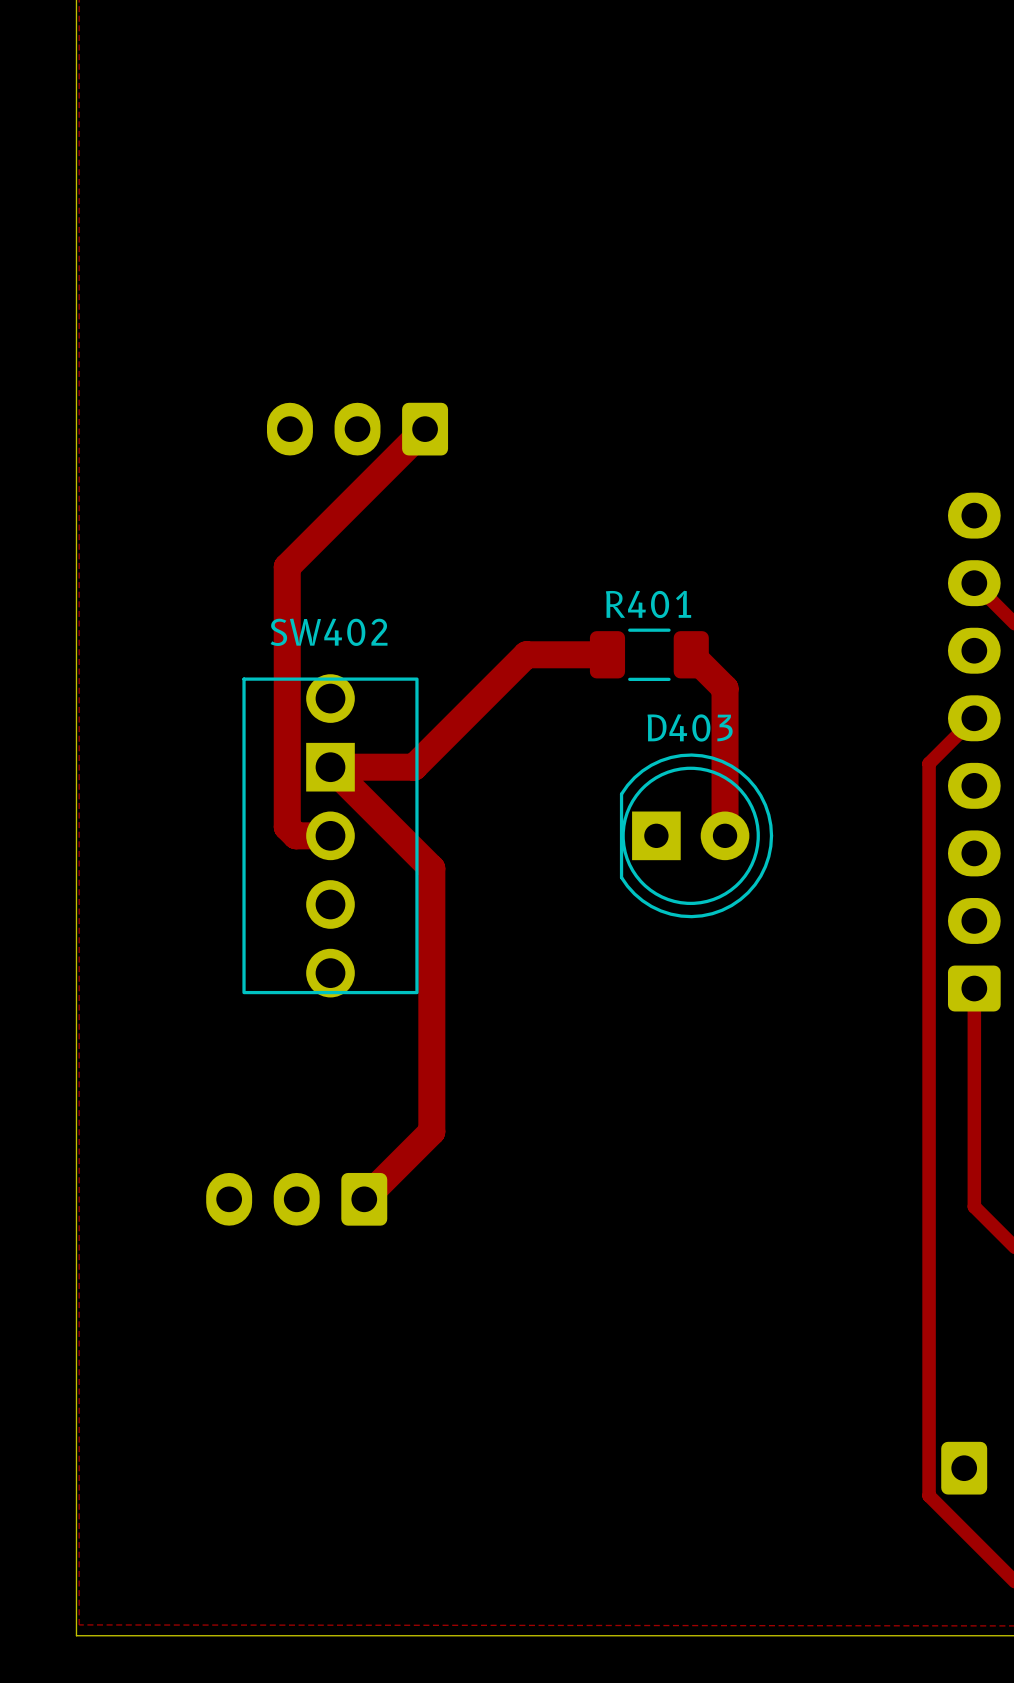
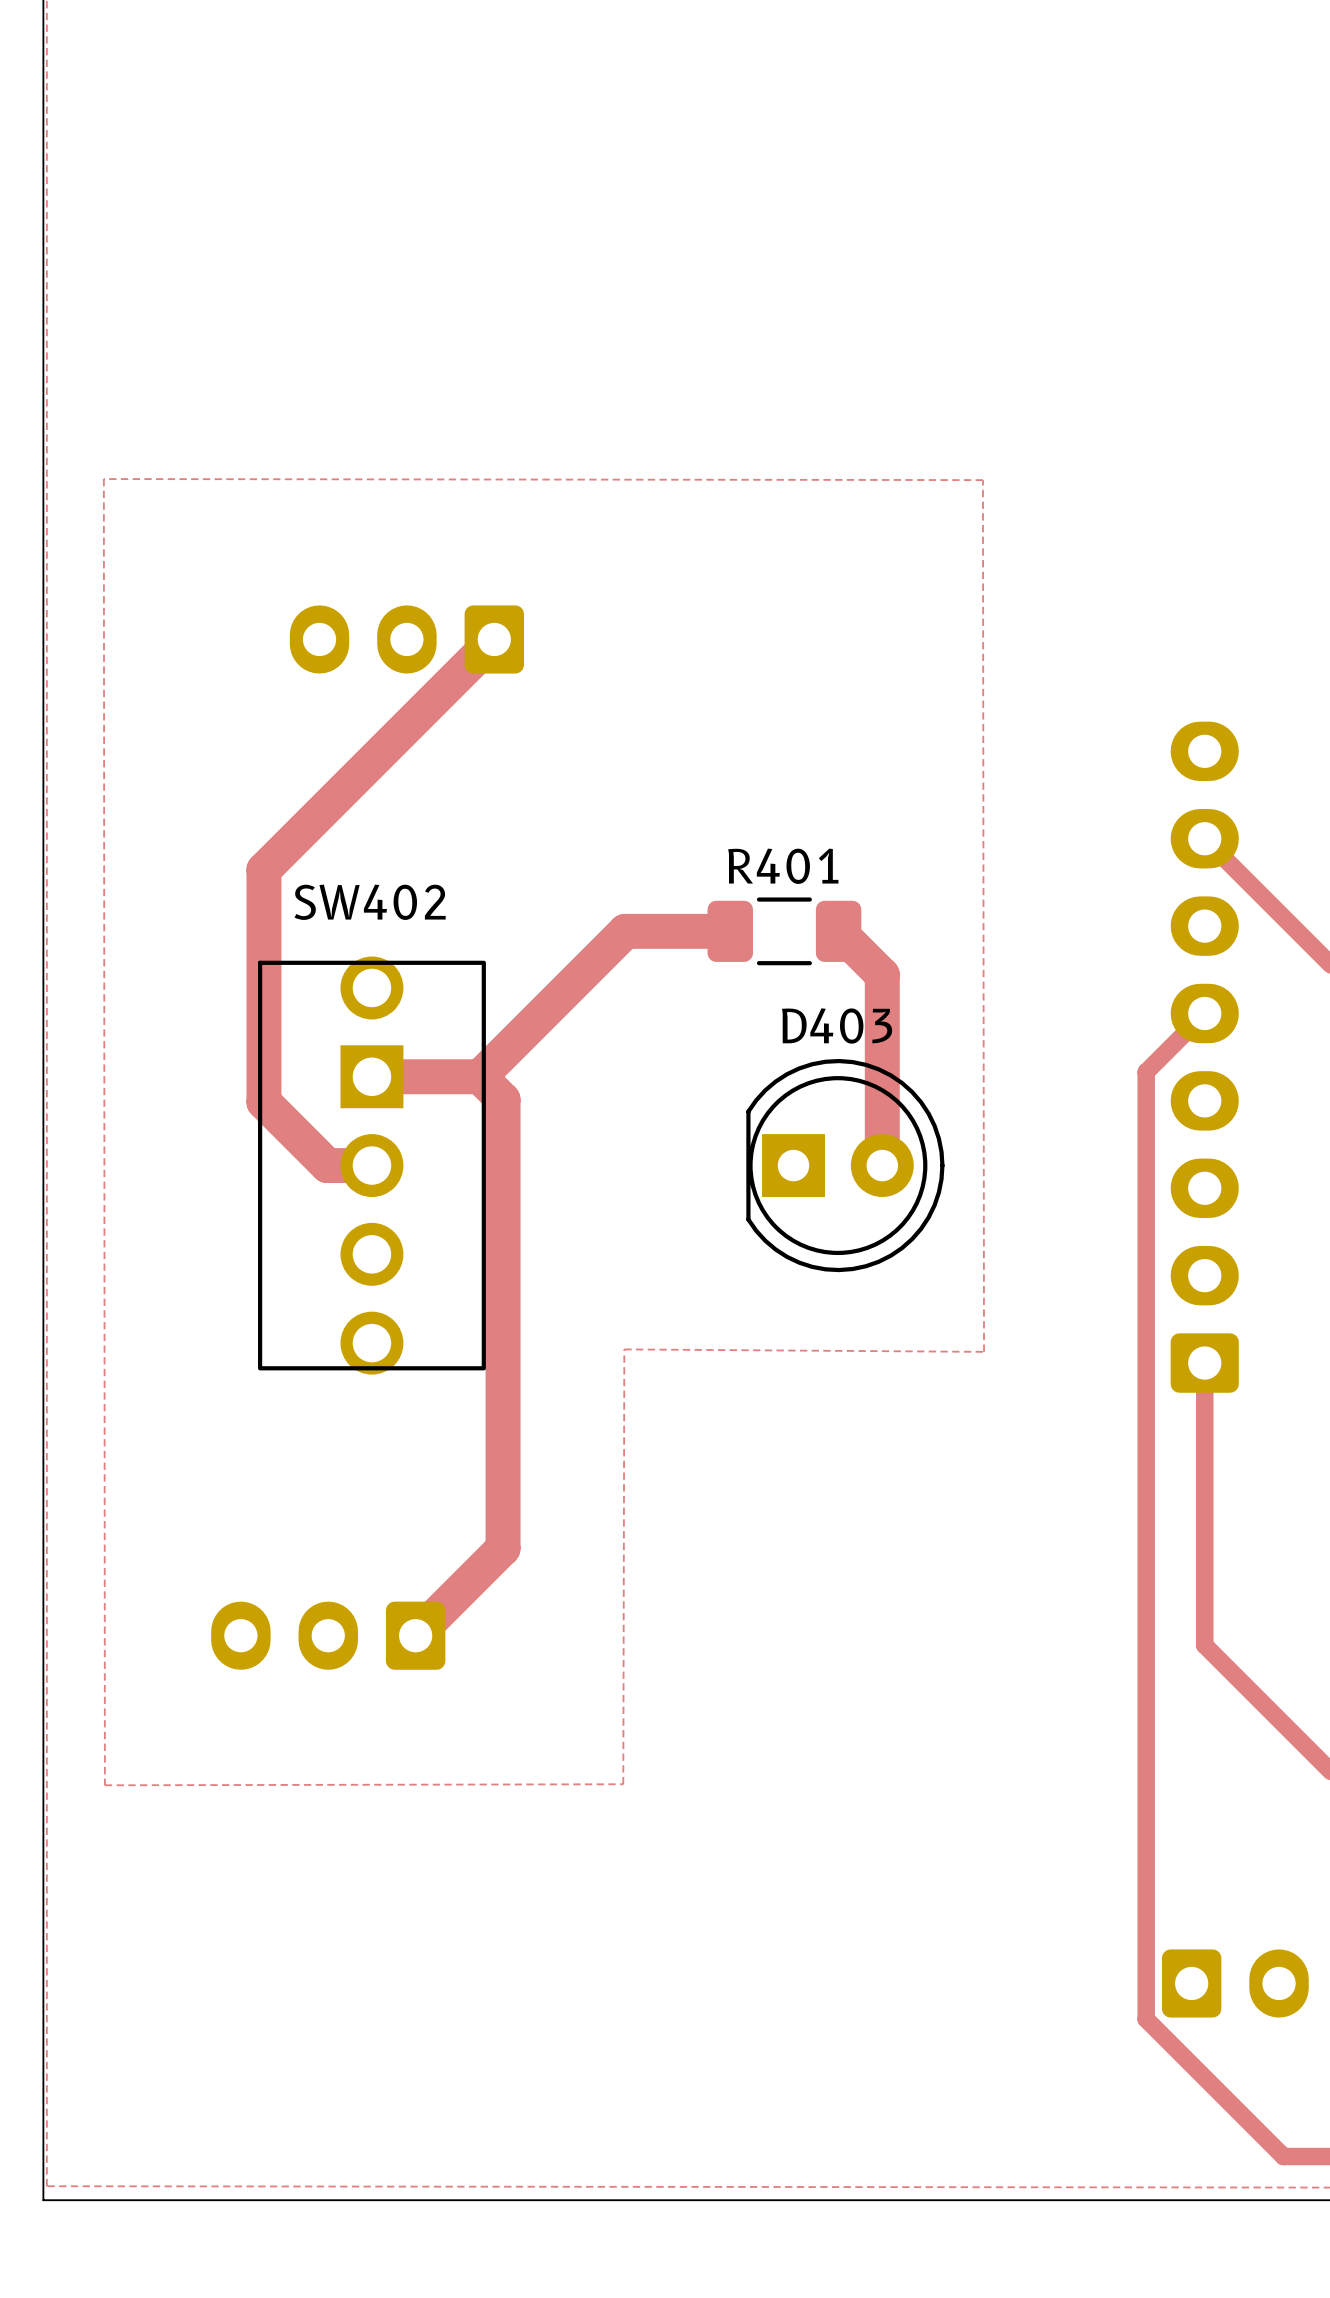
zone outline: none -> (103, 479) (104, 1785) (623, 1784) (624, 1349) (984, 1351) (982, 480) (103, 479)
track: (287, 566) (287, 827) -> (316, 817) (263, 869) (263, 1102) (316, 1154)
track: (330, 767) (431, 868) -> (479, 1076) (503, 1099) (503, 1207)

